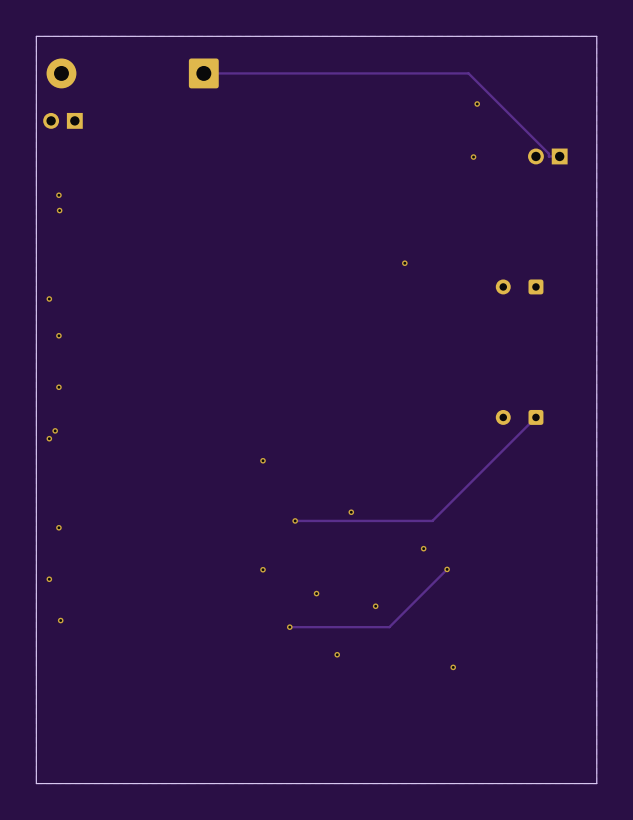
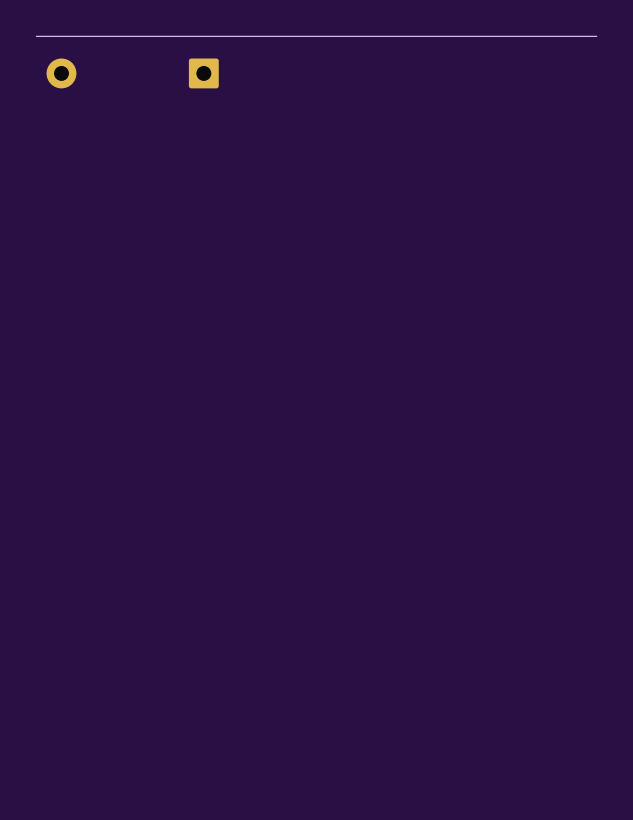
board edge: (596, 36) (596, 783) (36, 783) (36, 36) -> none
track: (203, 73) (468, 73) (548, 153) (548, 156) (559, 156) -> none
via: (477, 104) -> none
part: (62, 120) -> none
part: (547, 156) -> none
via: (473, 157) -> none
via: (58, 195) -> none
via: (59, 210) -> none
via: (404, 263) -> none
part: (519, 286) -> none
via: (49, 298) -> none
via: (58, 335) -> none
via: (58, 387) -> none
part: (519, 417) -> none
track: (535, 417) (432, 520) (295, 520) -> none
via: (55, 430) -> none
via: (49, 438) -> none
via: (263, 460) -> none
via: (351, 512) -> none
via: (295, 520) -> none
via: (58, 527) -> none
via: (423, 548) -> none
via: (263, 569) -> none
track: (447, 569) (389, 627) (289, 627) -> none
via: (447, 569) -> none
via: (49, 579) -> none
via: (316, 593) -> none
via: (375, 606) -> none
via: (60, 620) -> none
via: (289, 627) -> none
via: (337, 654) -> none
via: (453, 667) -> none

